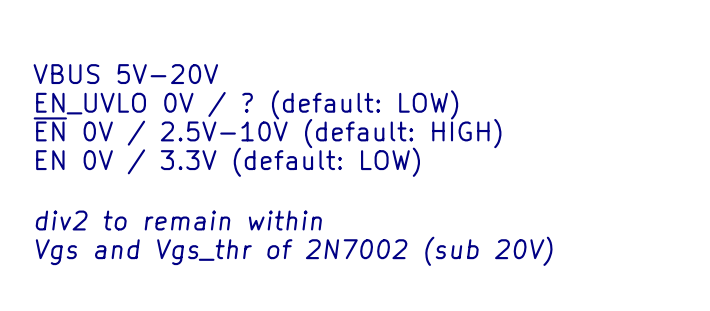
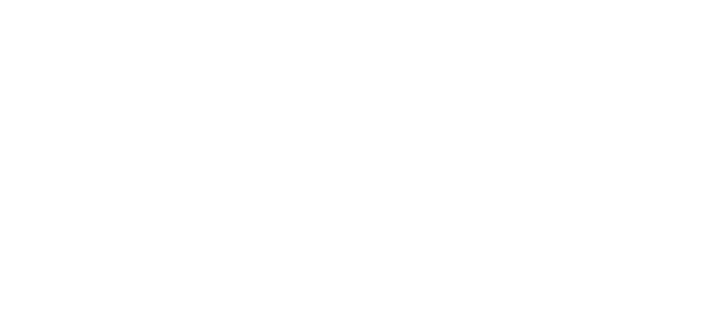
text: VBUS 5V-20V (125, 74) -> none
text: EN_UVLO 0V / ? (default: LOW) (247, 104) -> none
text: ~{EN} 0V / 2.5V-10V (default: HIGH) (267, 132) -> none
text: EN 0V / 3.3V (default: LOW) (228, 162) -> none
text: div2 to remain within (178, 220) -> none
text: Vgs and Vgs_thr of 2N7002 (sub 20V) (294, 251) -> none

